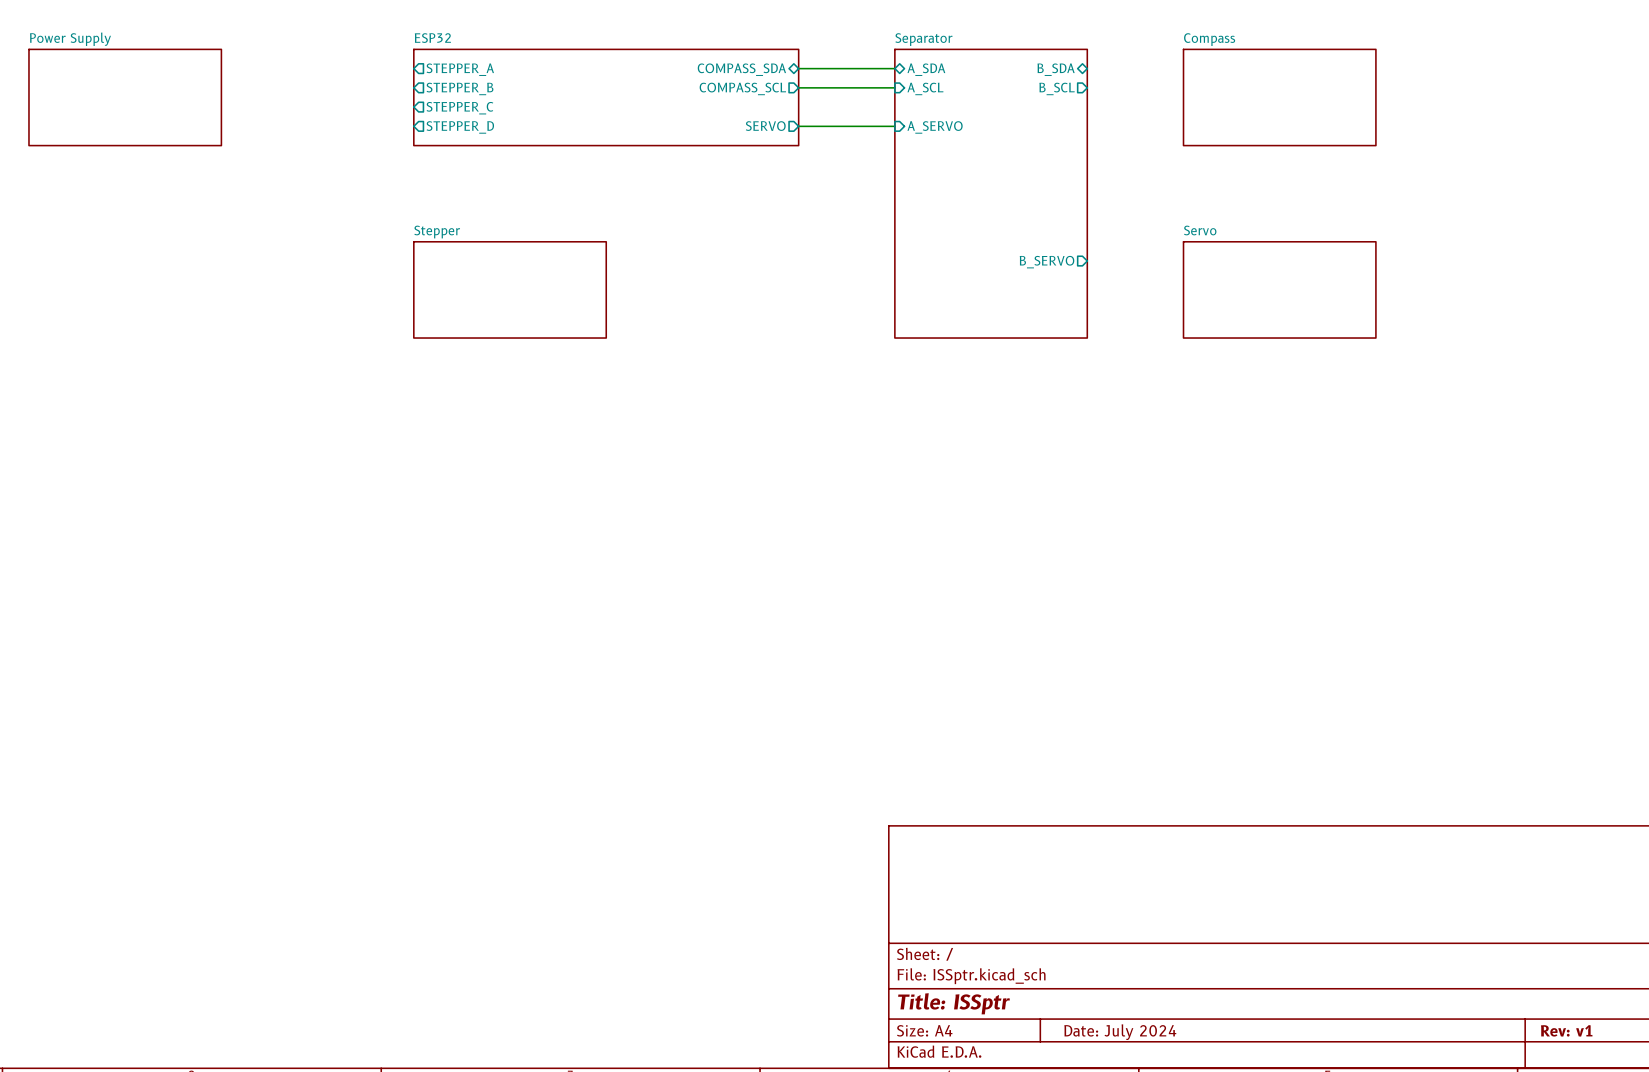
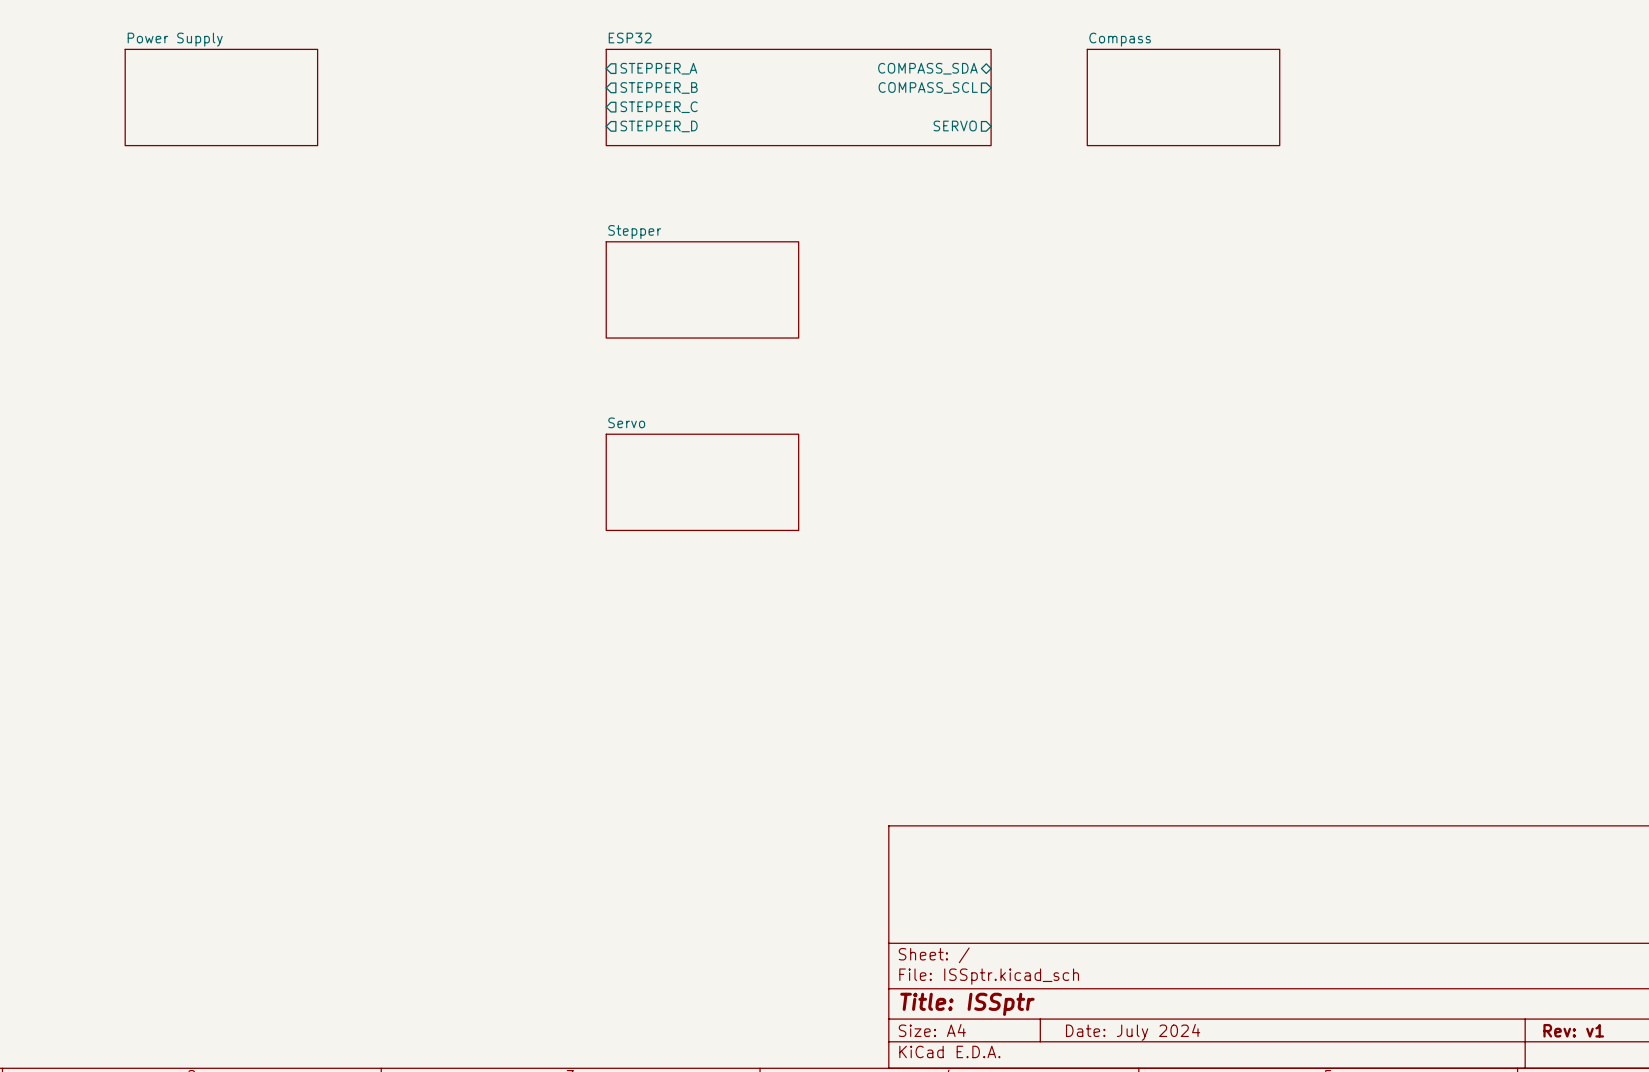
wire: (798, 68) (894, 68) -> none
sheet pin: STEPPER_A (460, 69) -> none
sheet pin: none -> STEPPER_A (658, 68)
sheet pin: COMPASS_SDA (741, 69) -> none
sheet pin: A_SDA (926, 69) -> COMPASS_SDA (927, 68)
sheet pin: B_SDA (1056, 69) -> none
wire: (798, 87) (894, 87) -> none
sheet pin: STEPPER_B (459, 88) -> none
sheet pin: none -> STEPPER_B (659, 87)
sheet pin: COMPASS_SCL (742, 88) -> none
sheet pin shape: input (925, 88) -> output (928, 87)
sheet pin: A_SCL (925, 88) -> COMPASS_SCL (928, 87)
sheet pin: B_SCL (1057, 88) -> none
sheet Power Supply position: (125, 97) -> (221, 97)
sheet ESP32 position: (606, 97) -> (798, 97)
sheet Compass position: (1279, 97) -> (1183, 97)
sheet pin: STEPPER_C (459, 108) -> none
sheet pin: none -> STEPPER_C (659, 107)
sheet pin: SERVO (765, 126) -> none
wire: (798, 126) (894, 126) -> none
sheet pin: STEPPER_D (460, 127) -> none
sheet pin: none -> STEPPER_D (659, 126)
sheet pin shape: input (935, 127) -> output (955, 125)
sheet pin: A_SERVO (935, 127) -> SERVO (955, 125)
sheet Separator: (991, 193) -> none
sheet pin: B_SERVO (1047, 262) -> none
sheet Stepper: (510, 289) -> none
sheet Stepper: none -> (702, 289)
sheet Servo: (1279, 289) -> none
sheet Servo: none -> (702, 482)

